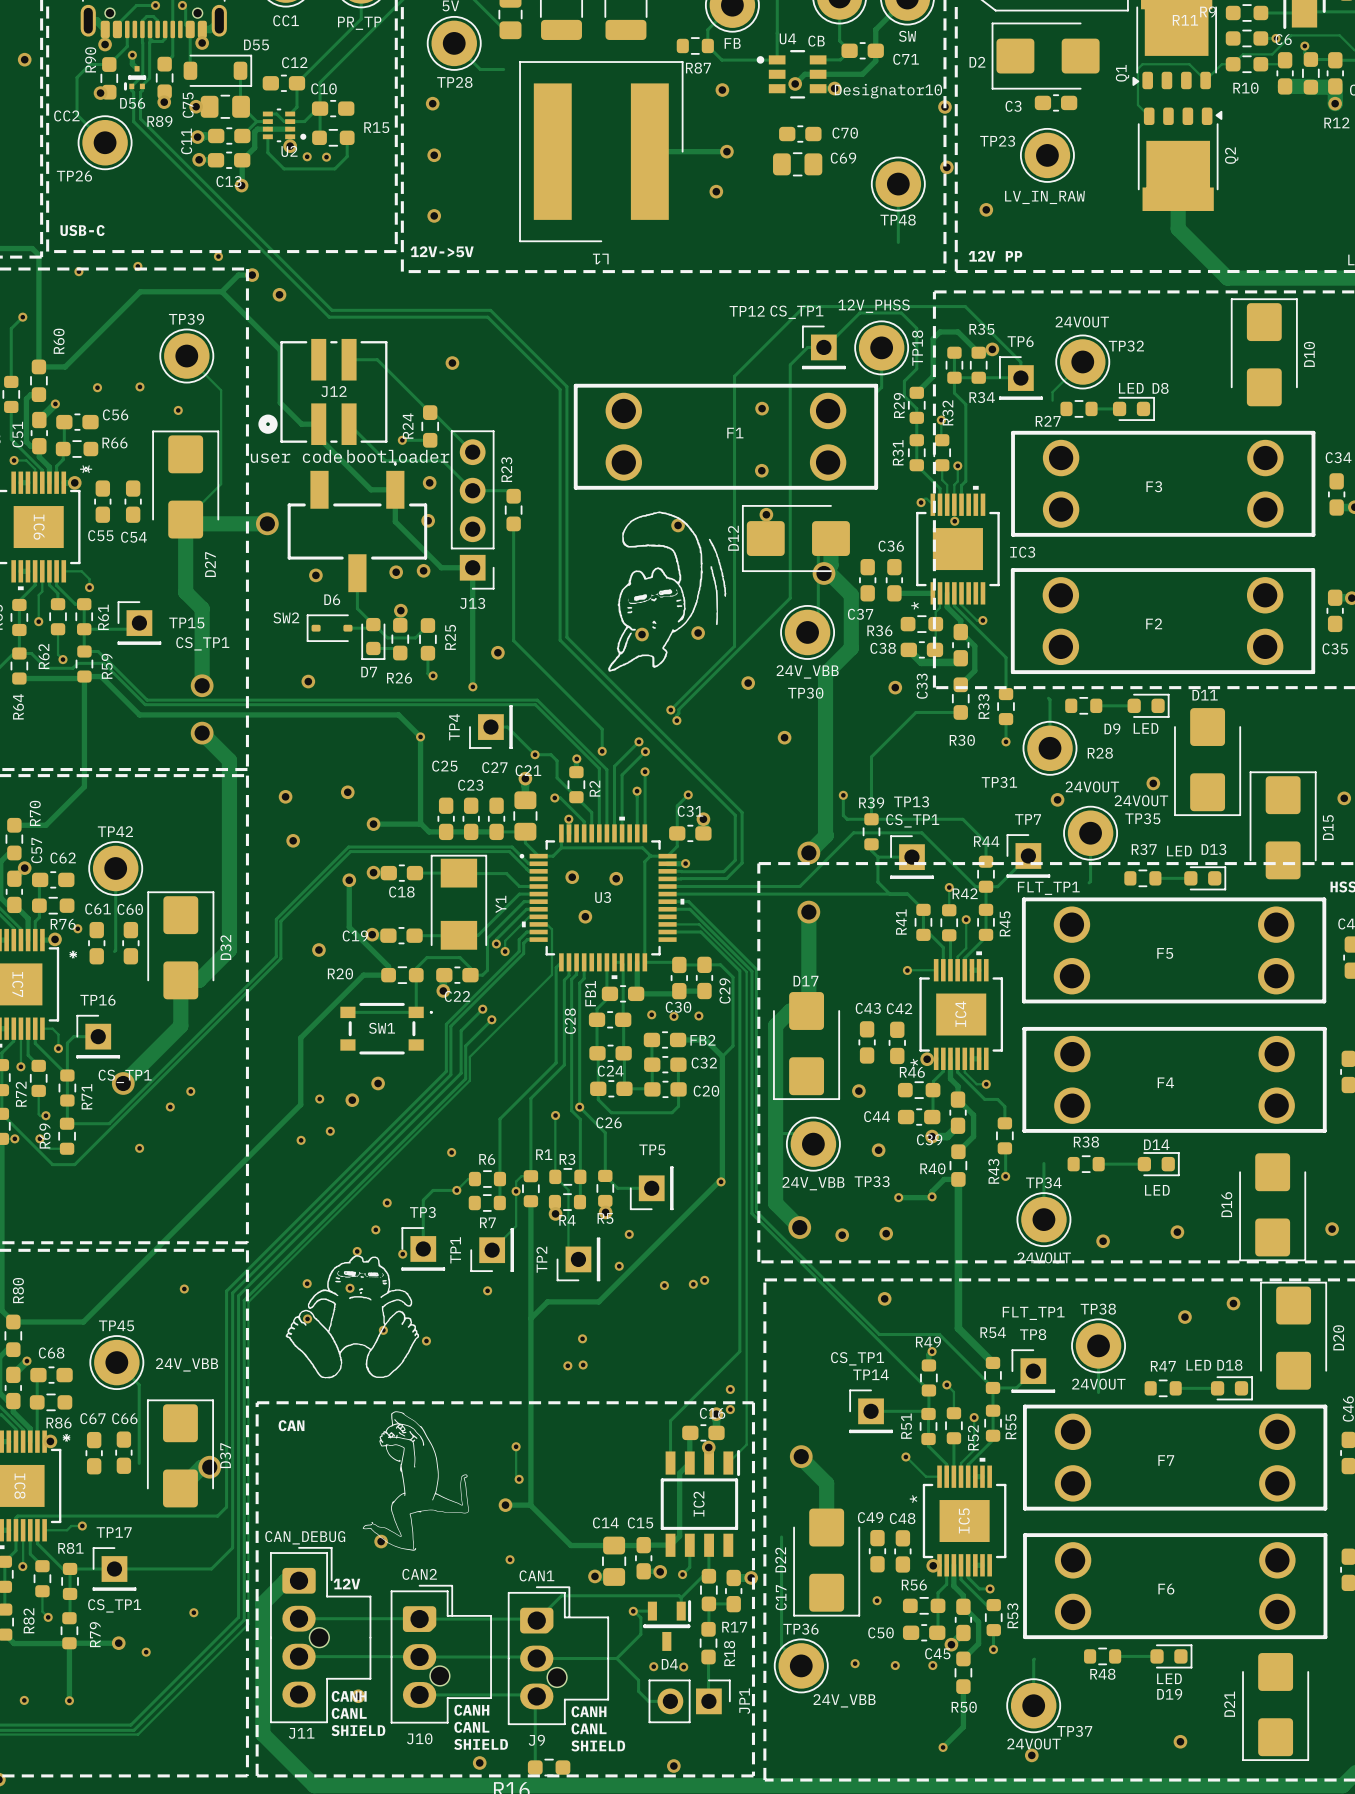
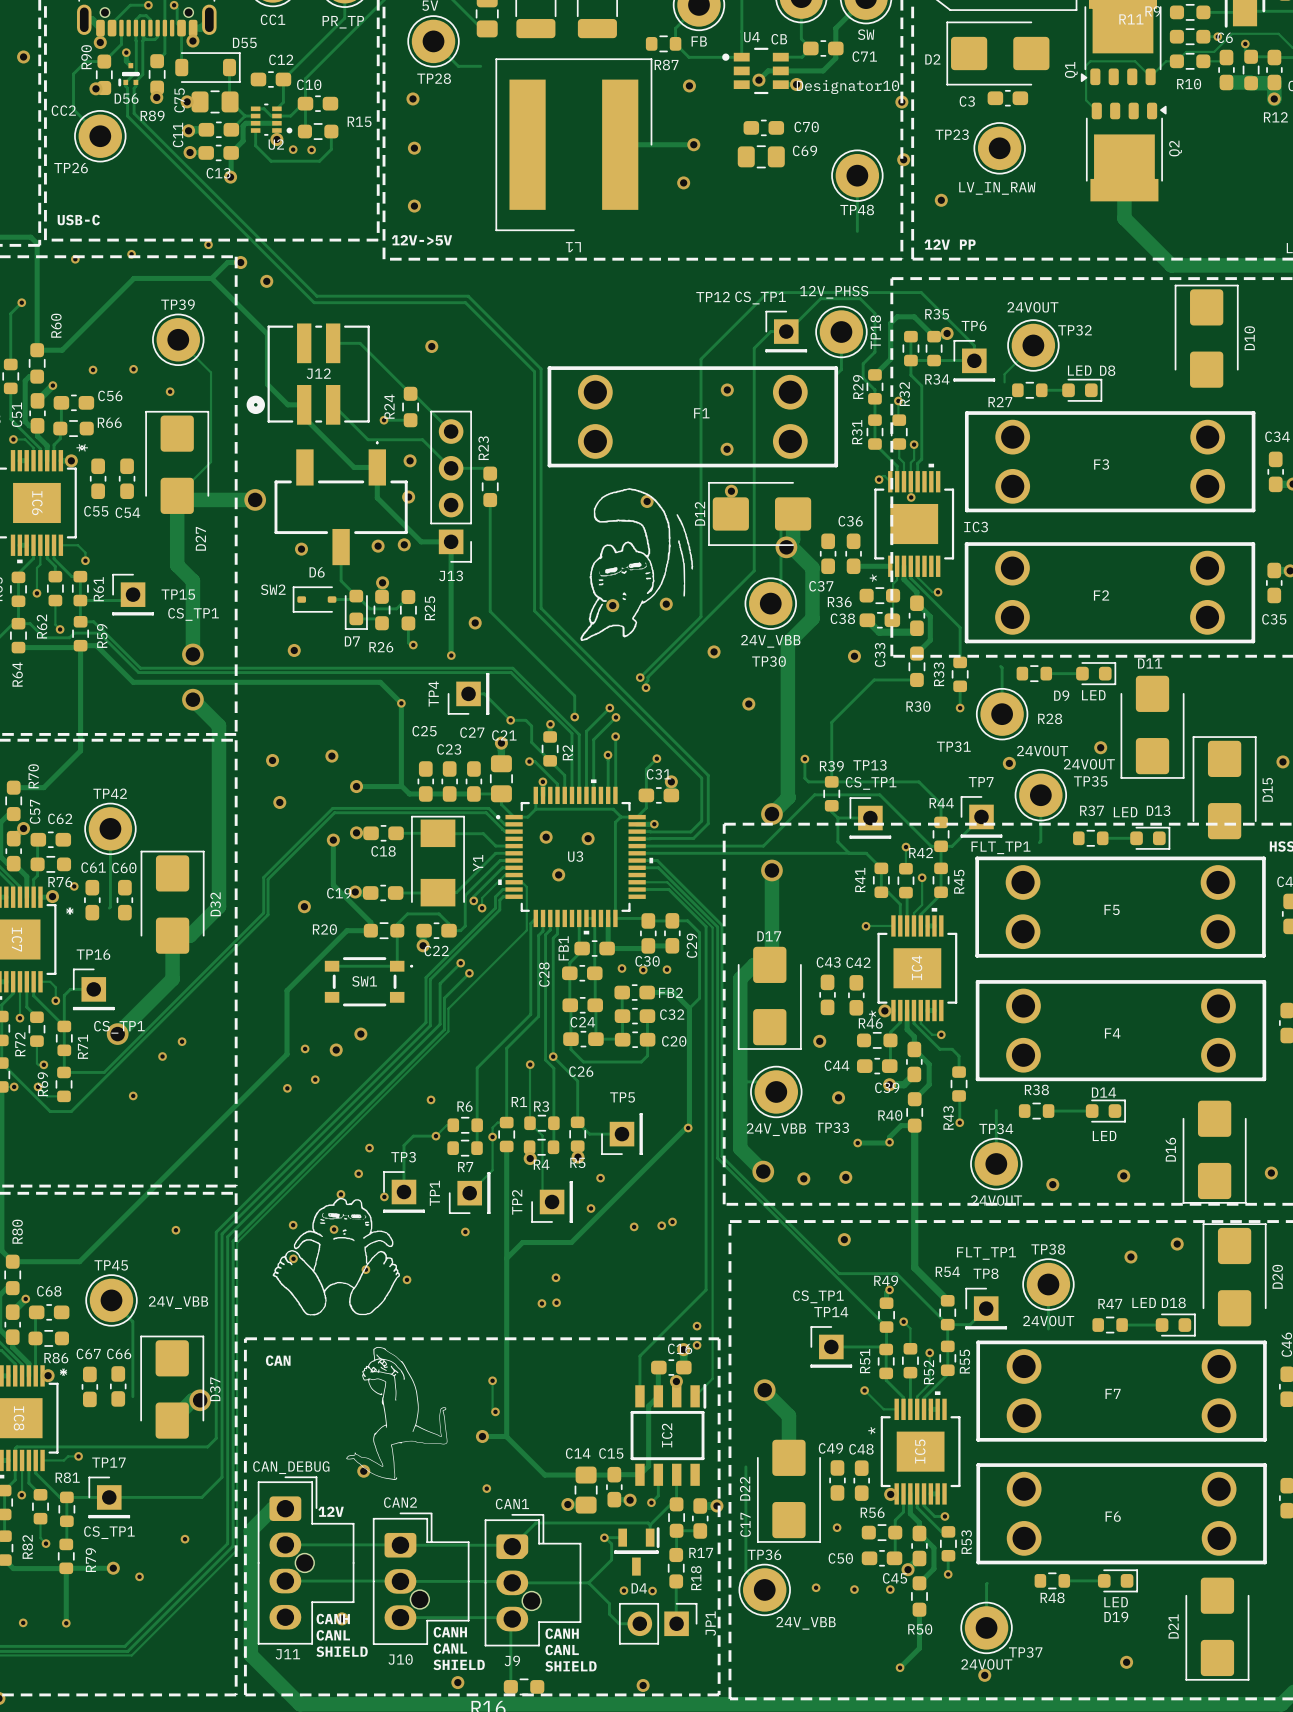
text: user code (296, 456) -> none
text: bootloader (398, 456) -> none

